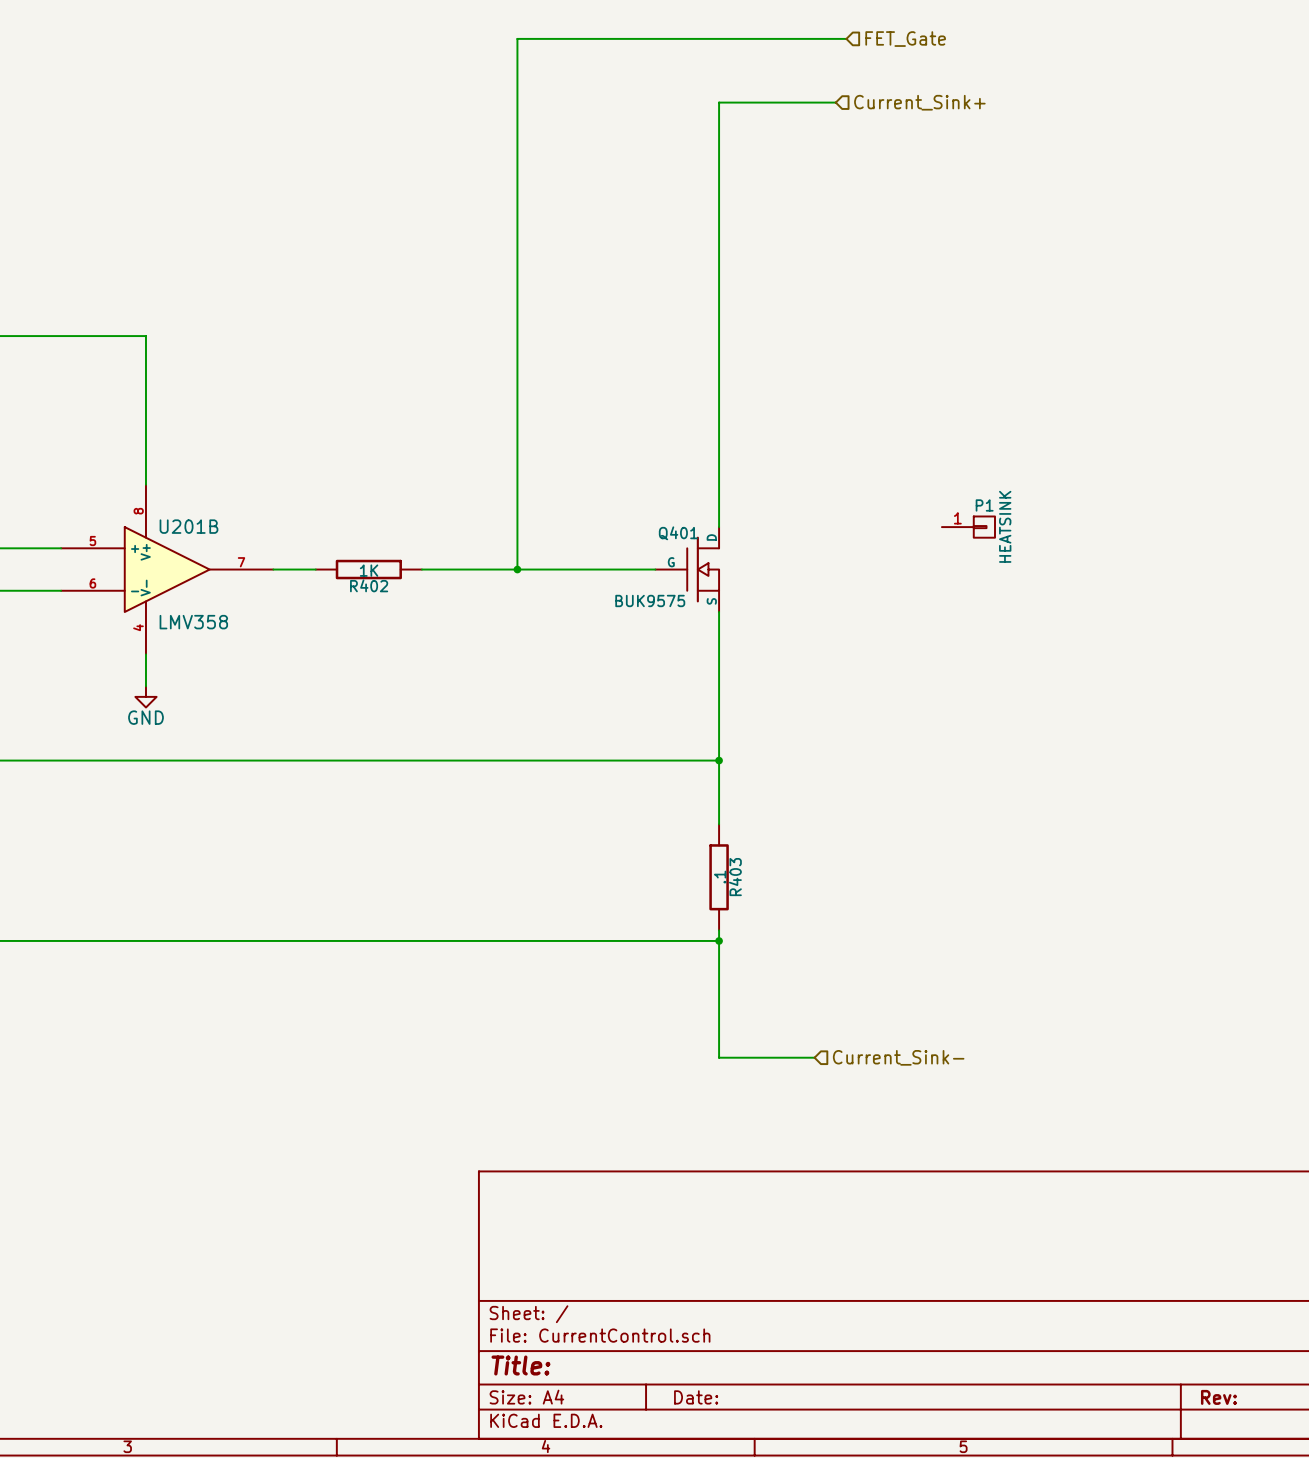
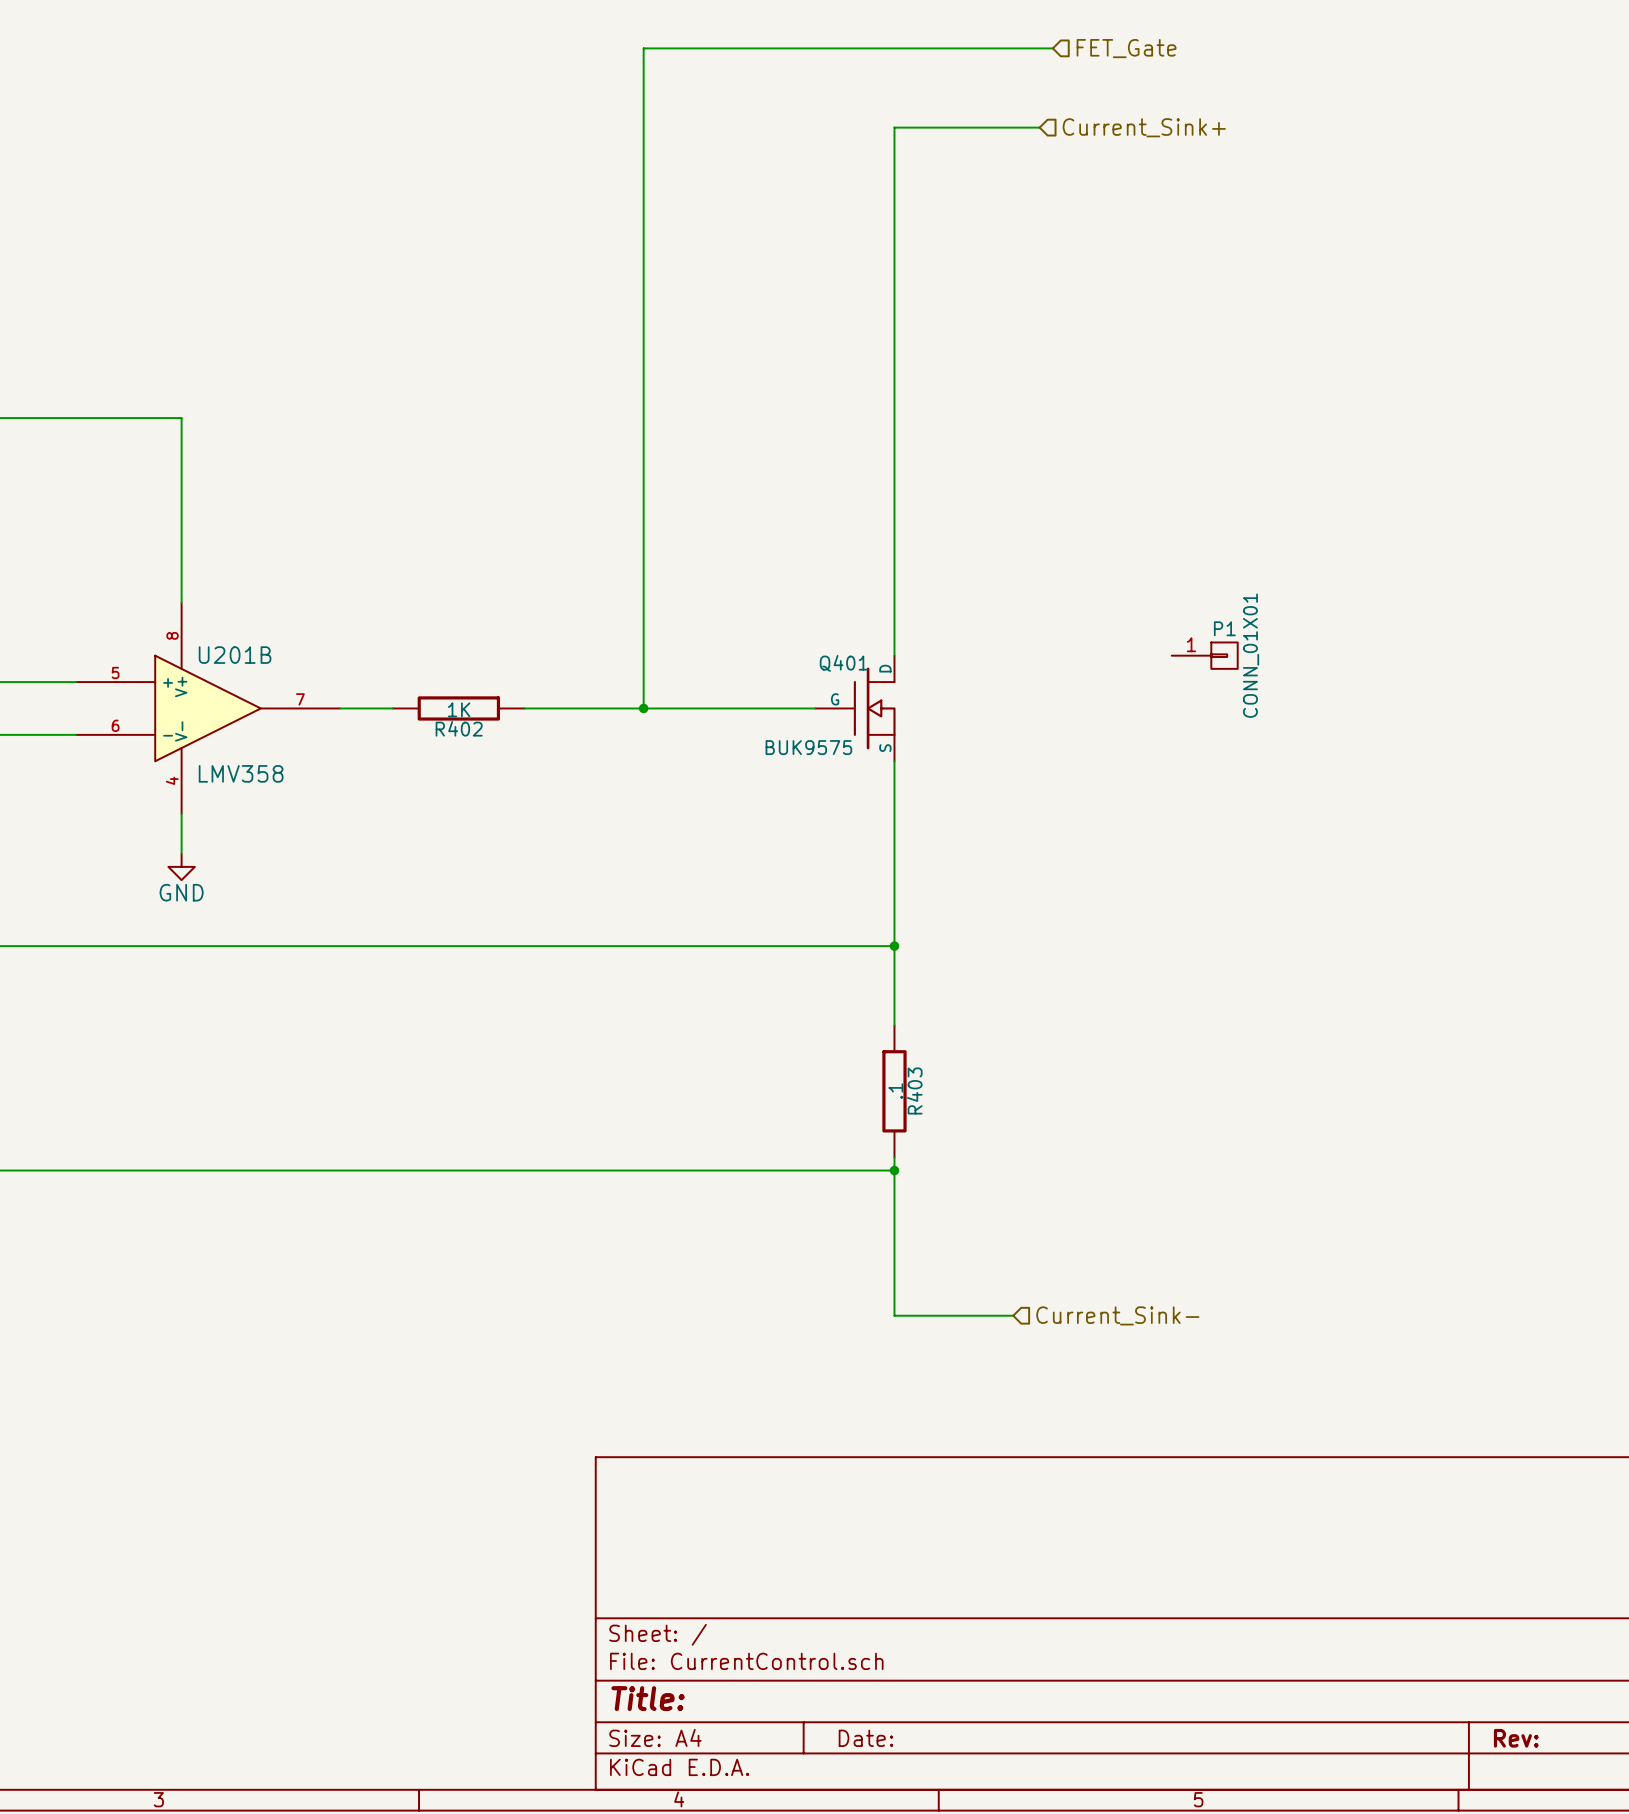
P1 value: HEATSINK (1005, 526) -> CONN_01X01 (1251, 655)

